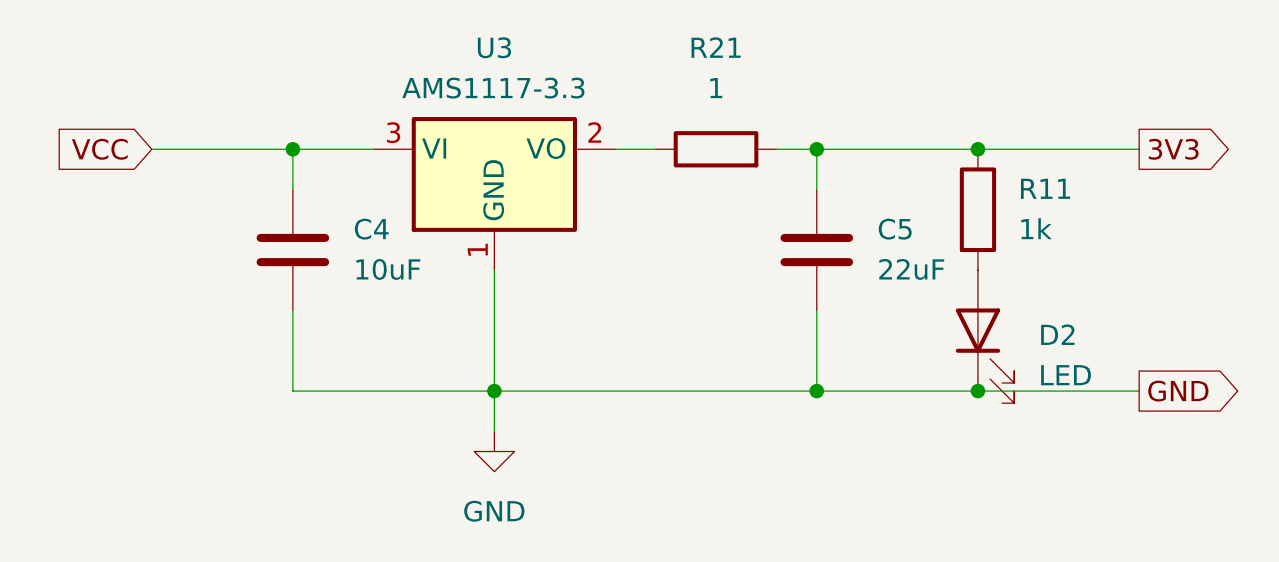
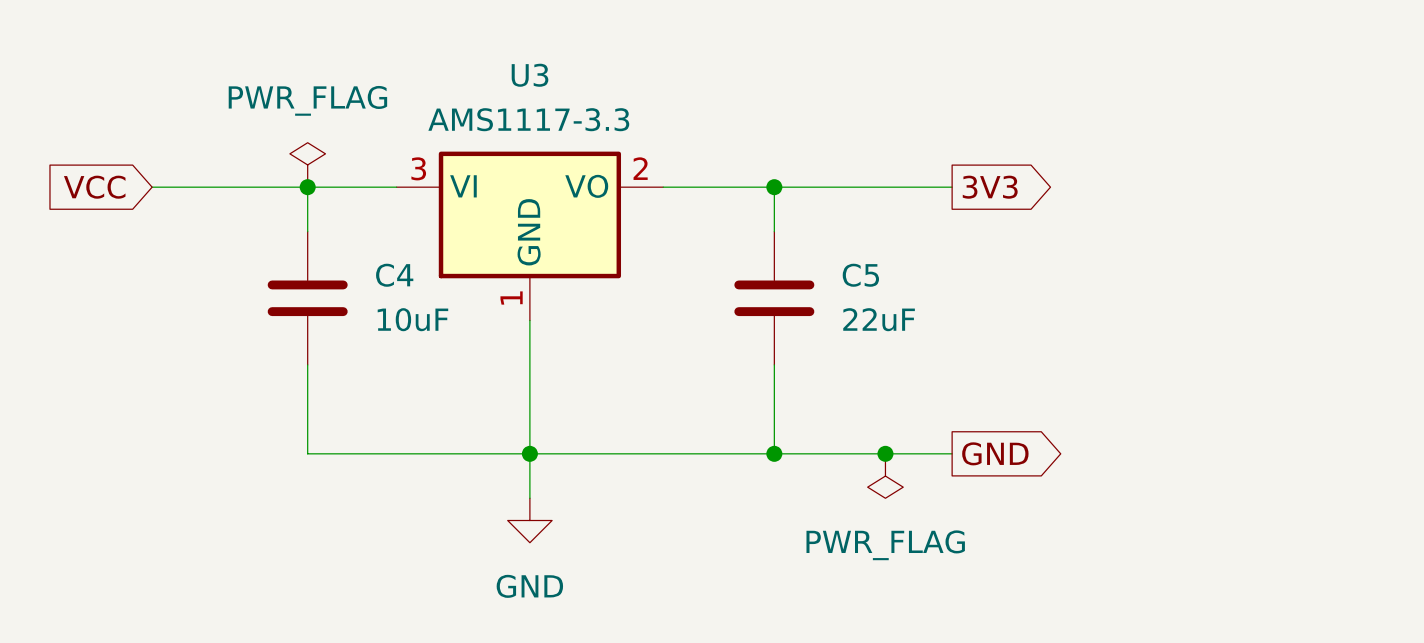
power symbol: none -> PWR_FLAG (307, 164)
wire: none -> (707, 187) (841, 187)
junction: none -> (774, 187)
R21: 1 (716, 149) -> none
wire: (816, 149) (816, 189) -> (774, 187) (774, 231)
junction: (816, 149) -> none
wire: (877, 149) (1139, 149) -> none
junction: (977, 149) -> none
global label position: 3V3 (1173, 149) -> 3V3 (990, 187)
R11: 1k (977, 209) -> none
C5 position: (816, 250) -> (774, 298)
wire: (816, 310) (816, 391) -> (774, 364) (774, 453)
D2: LED (985, 336) -> none
junction: none -> (774, 453)
wire: (877, 391) (1139, 391) -> none
junction: (977, 391) -> none
global label position: GND (1178, 391) -> GND (995, 453)
power symbol: none -> PWR_FLAG (885, 476)

